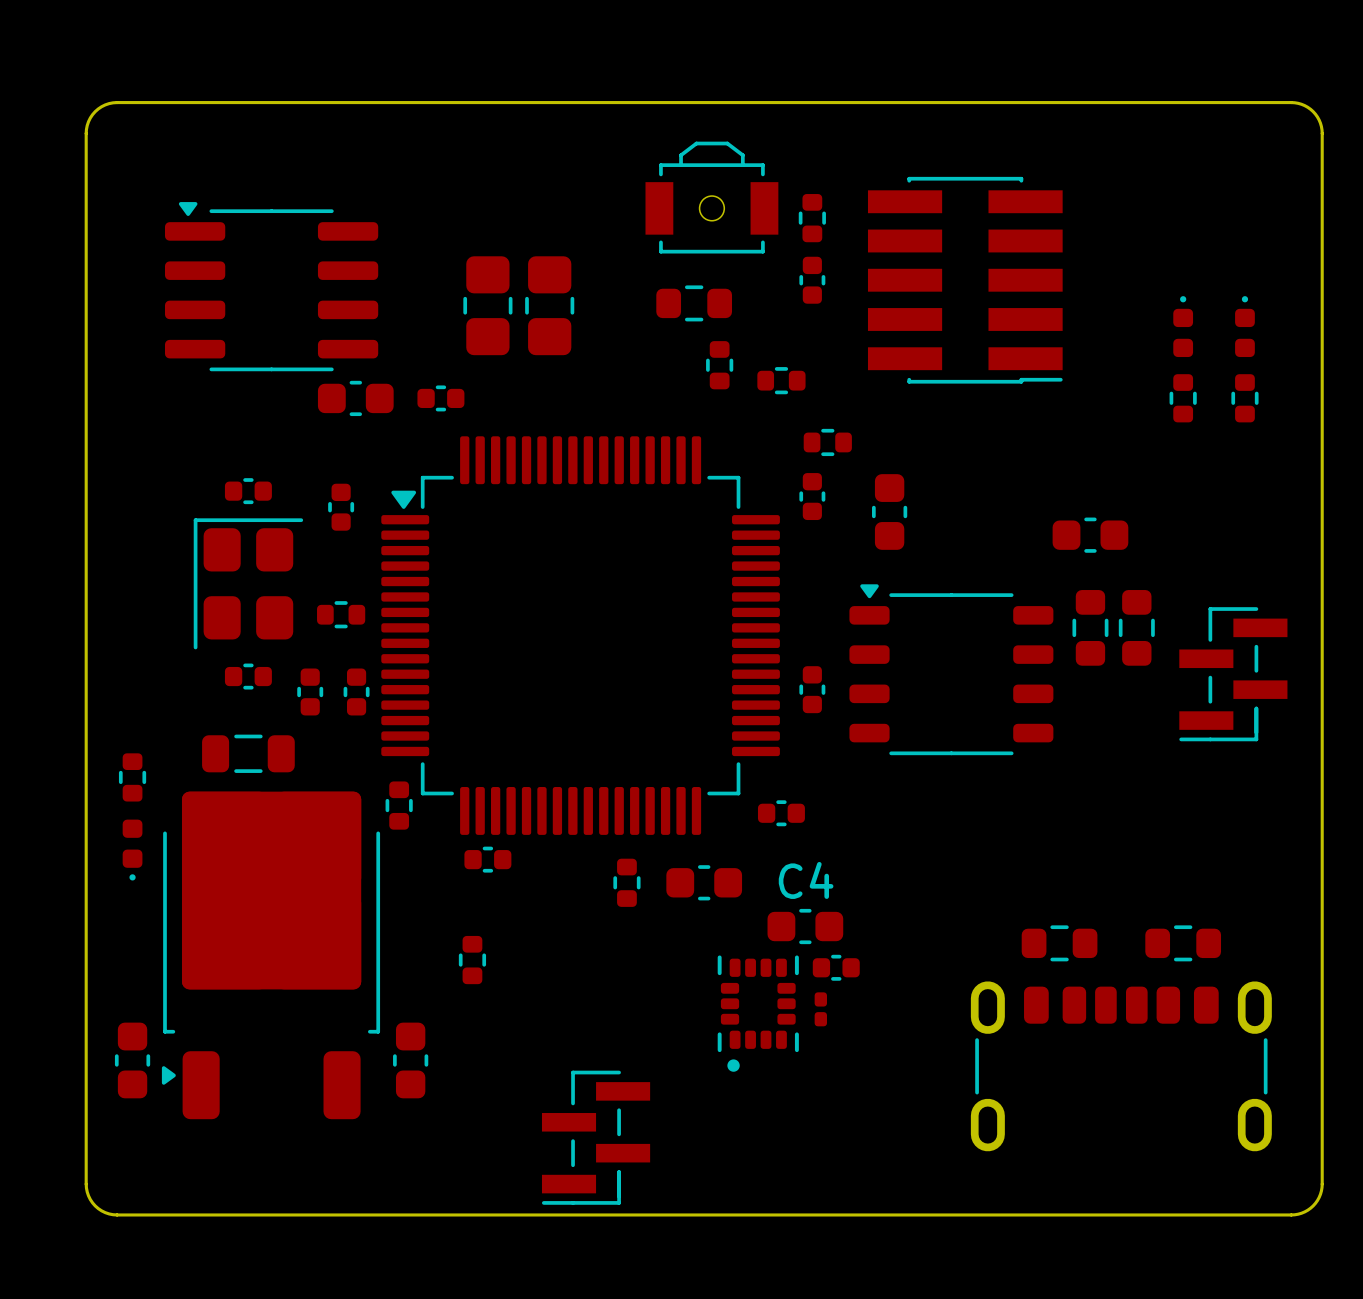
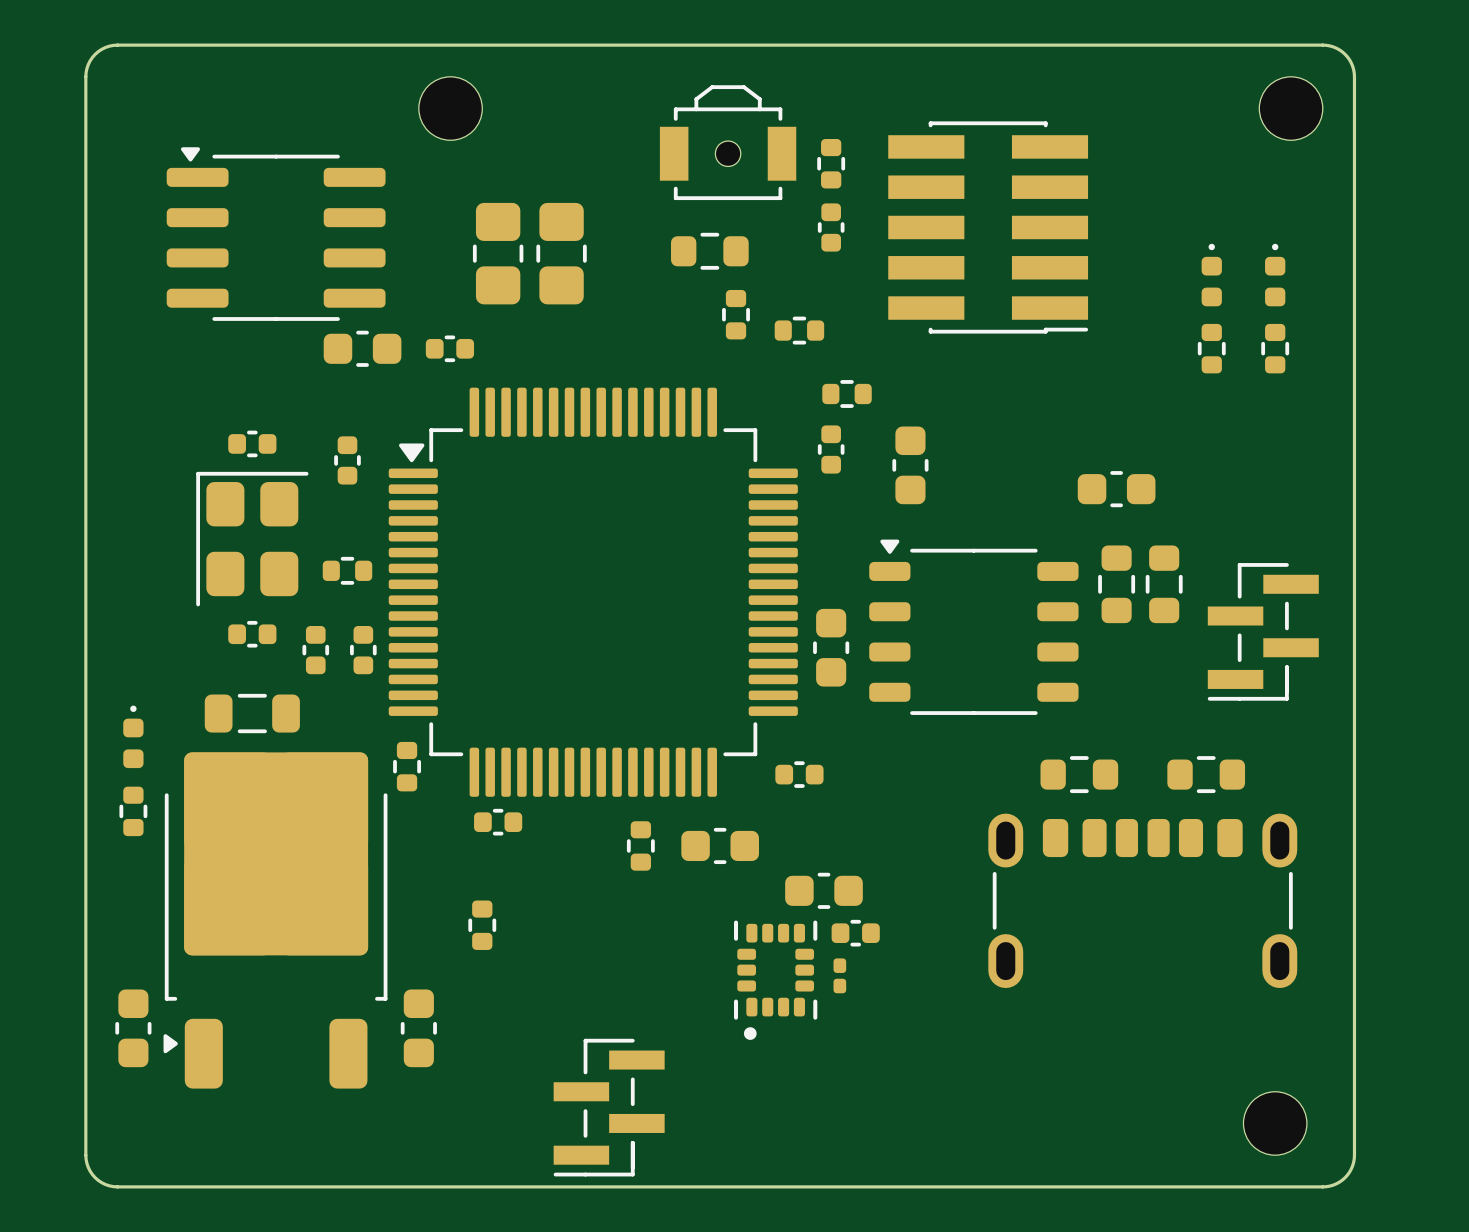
part: none -> (450, 108)
part: none -> (1291, 108)
part footprint: [799, 666, 826, 714] -> [813, 608, 850, 687]
part footprint: [118, 753, 147, 802] -> [123, 705, 144, 769]
part: none -> (1079, 774)
part: none -> (1206, 774)
part footprint: [122, 819, 143, 881] -> [119, 786, 148, 837]
C4 name: C4 (806, 880) -> none
part: (1059, 943) -> none
part: (1183, 943) -> none
part position: (1121, 1066) -> (1142, 900)
part: none -> (1275, 1123)

